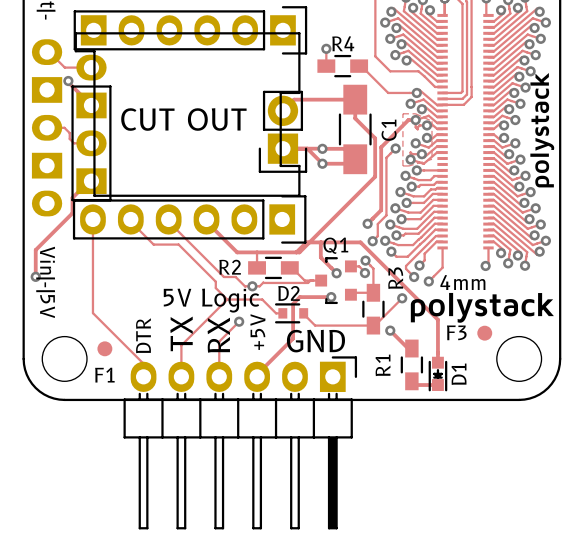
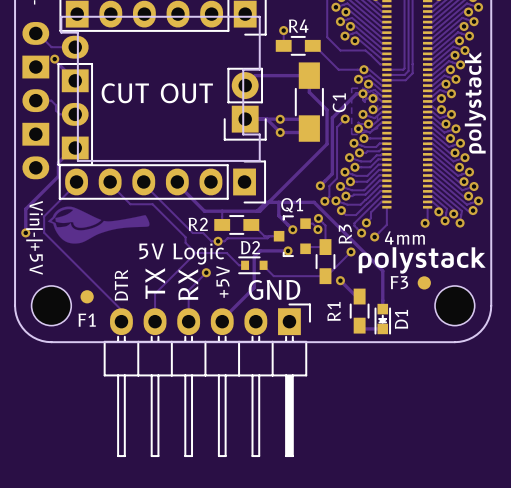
track: (92, 221) (92, 313) -> (76, 184) (44, 216) (44, 232) (76, 265)
drawing: none -> [47, 206, 150, 244]
text: Vin|-|5V (45, 282) -> Vin|-|+5V (34, 237)

